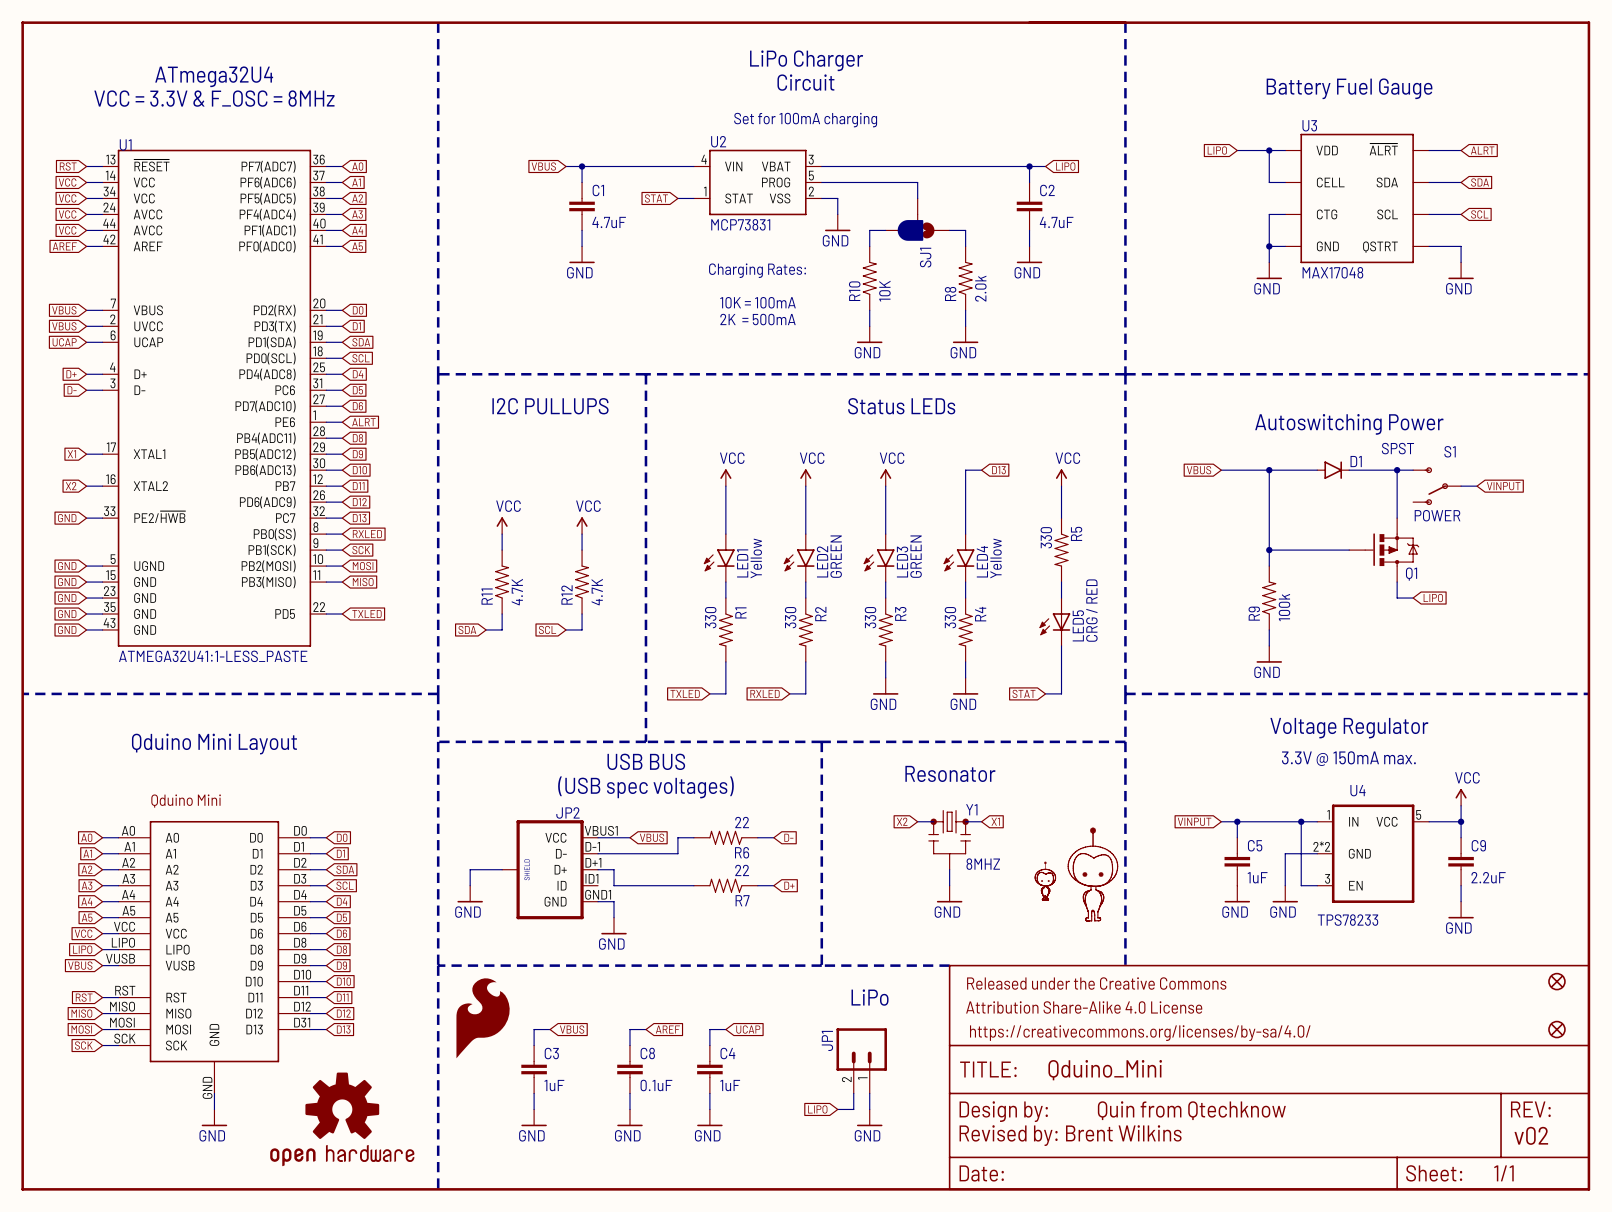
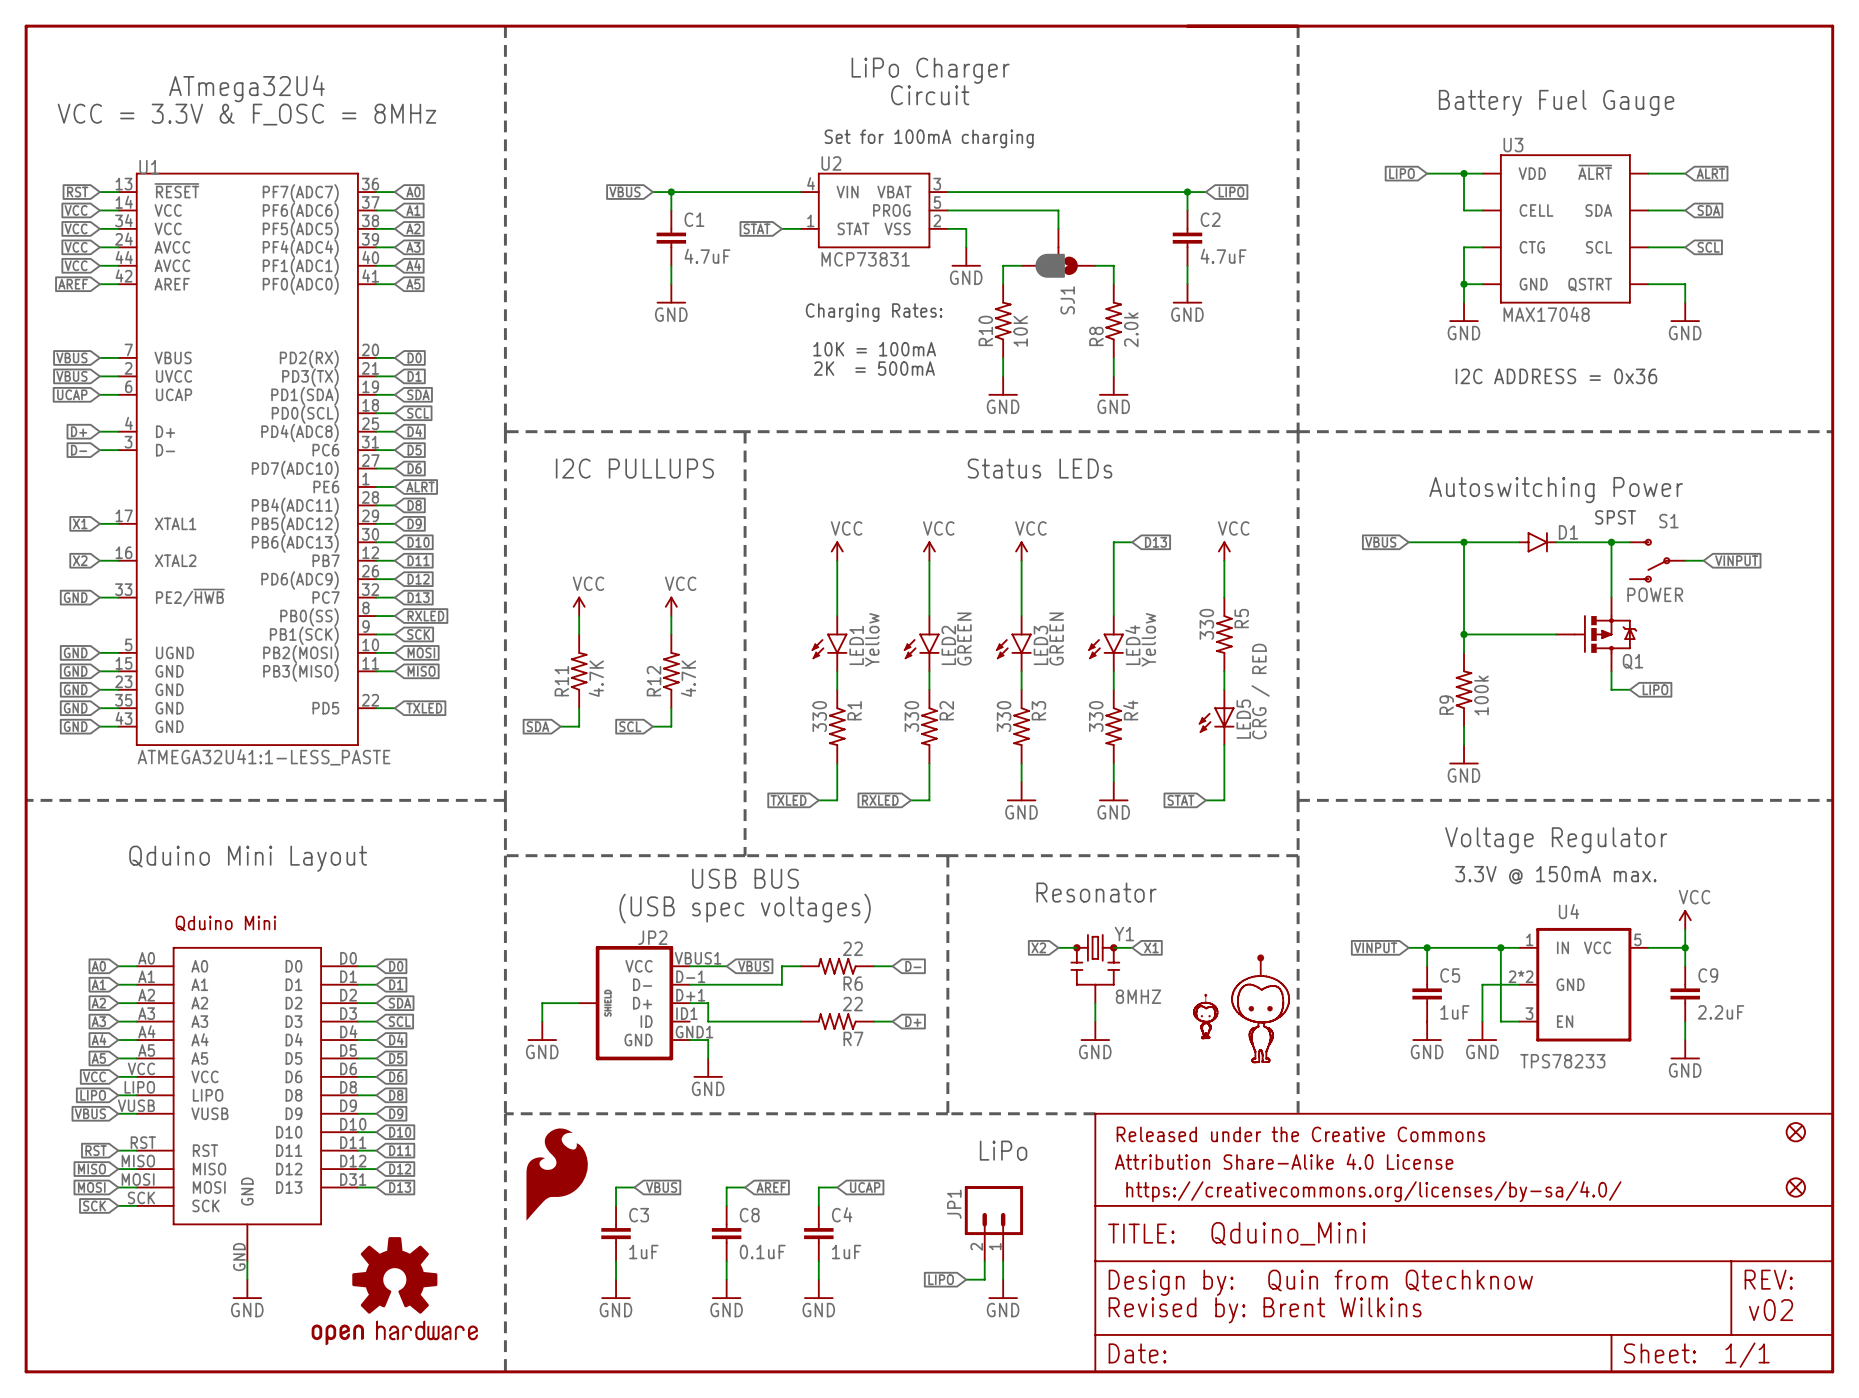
text: none -> I2C ADDRESS = 0x36 (1556, 376)

